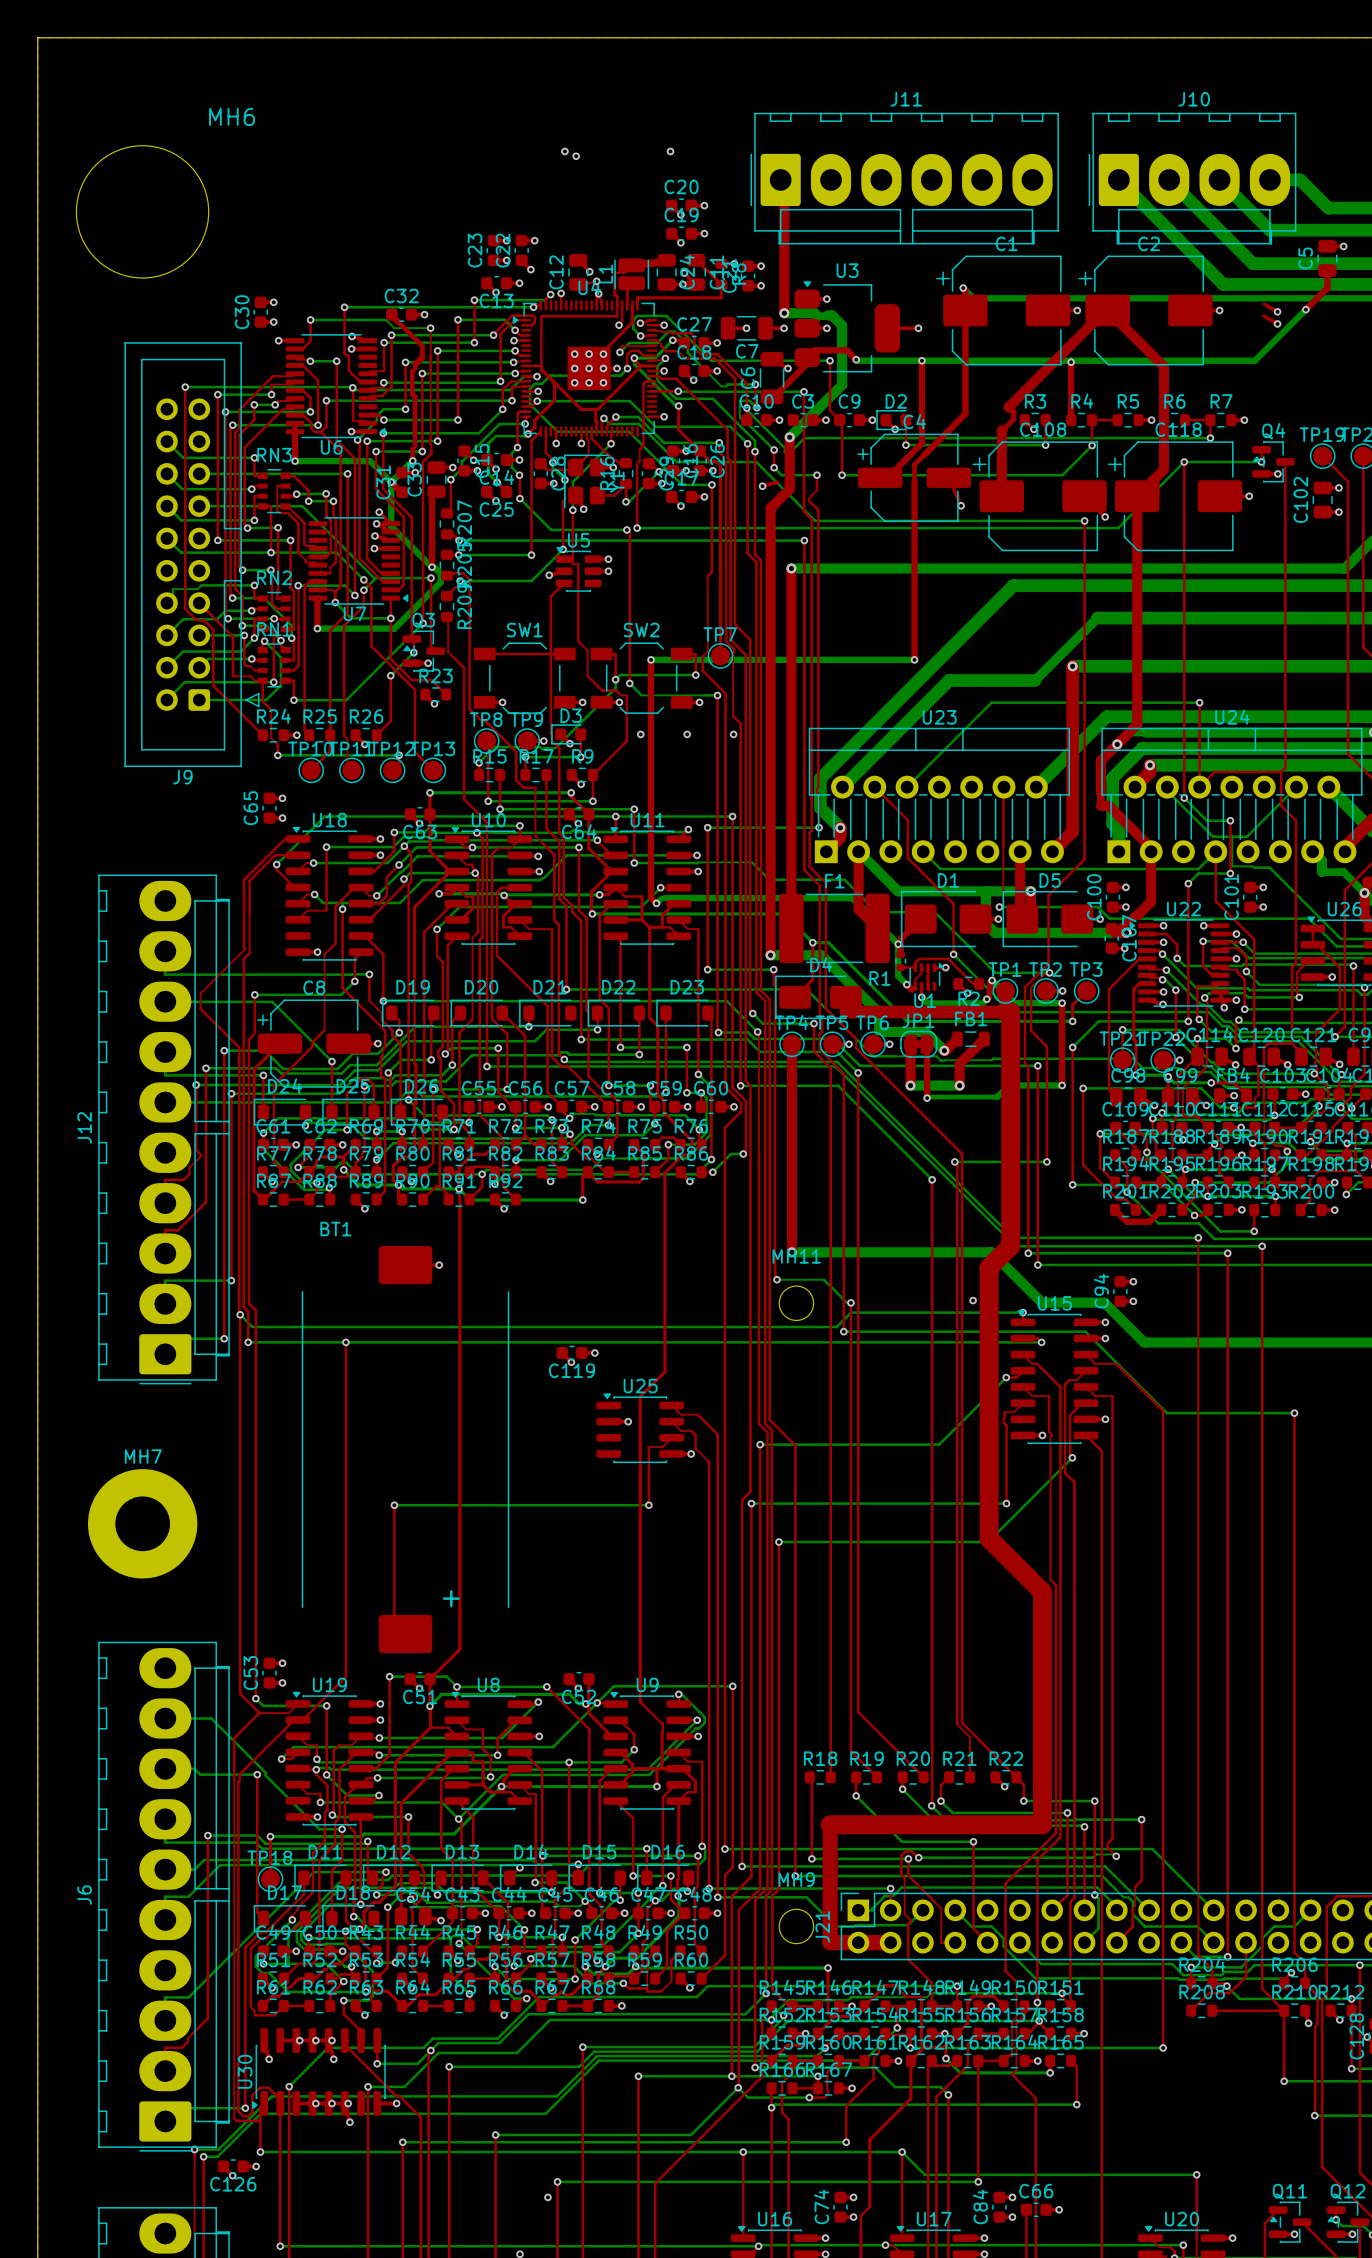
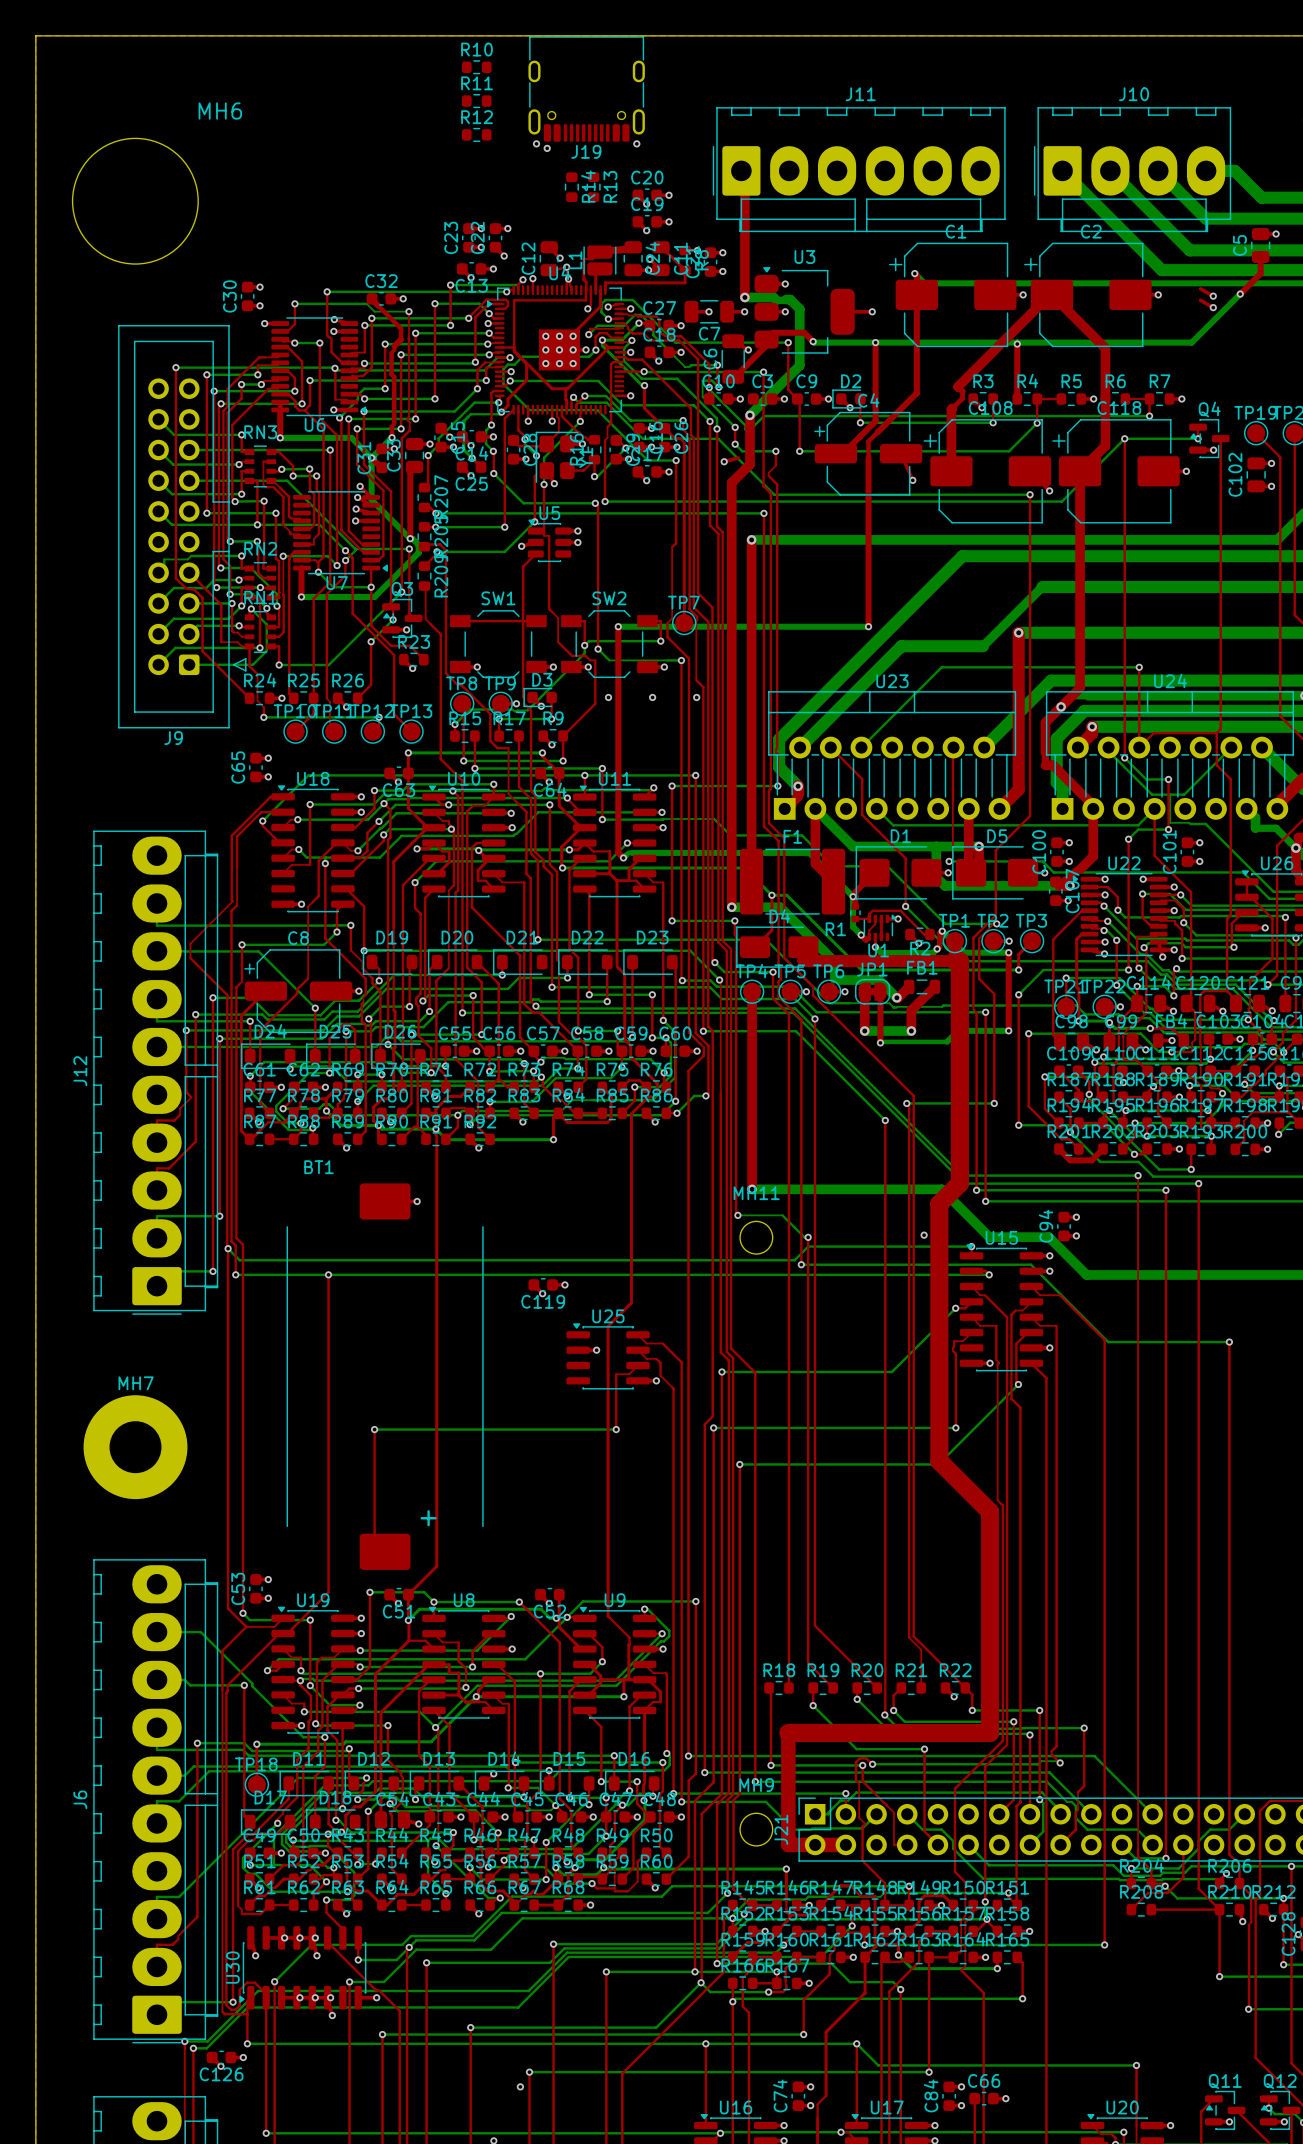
R10: none -> (476, 67)
J19: none -> (586, 89)
R11: none -> (476, 101)
R12: none -> (476, 134)
R14: none -> (571, 187)
R13: none -> (593, 187)

